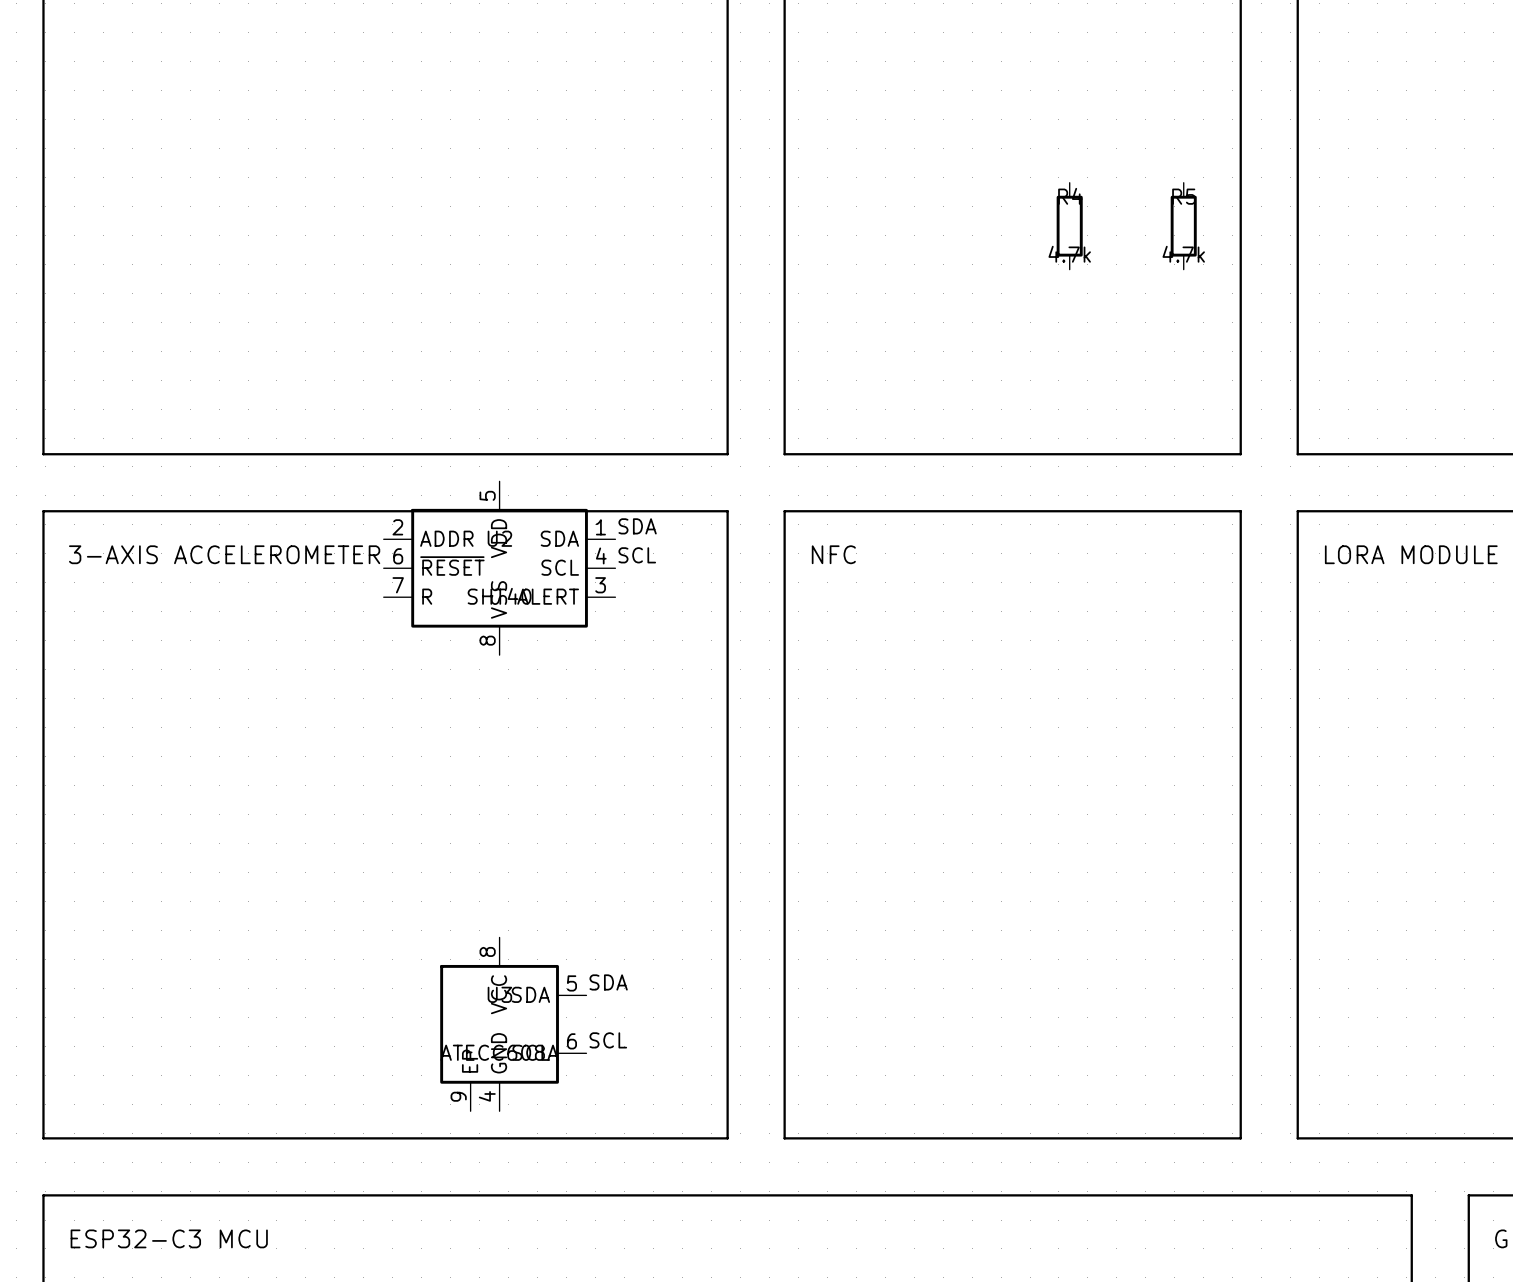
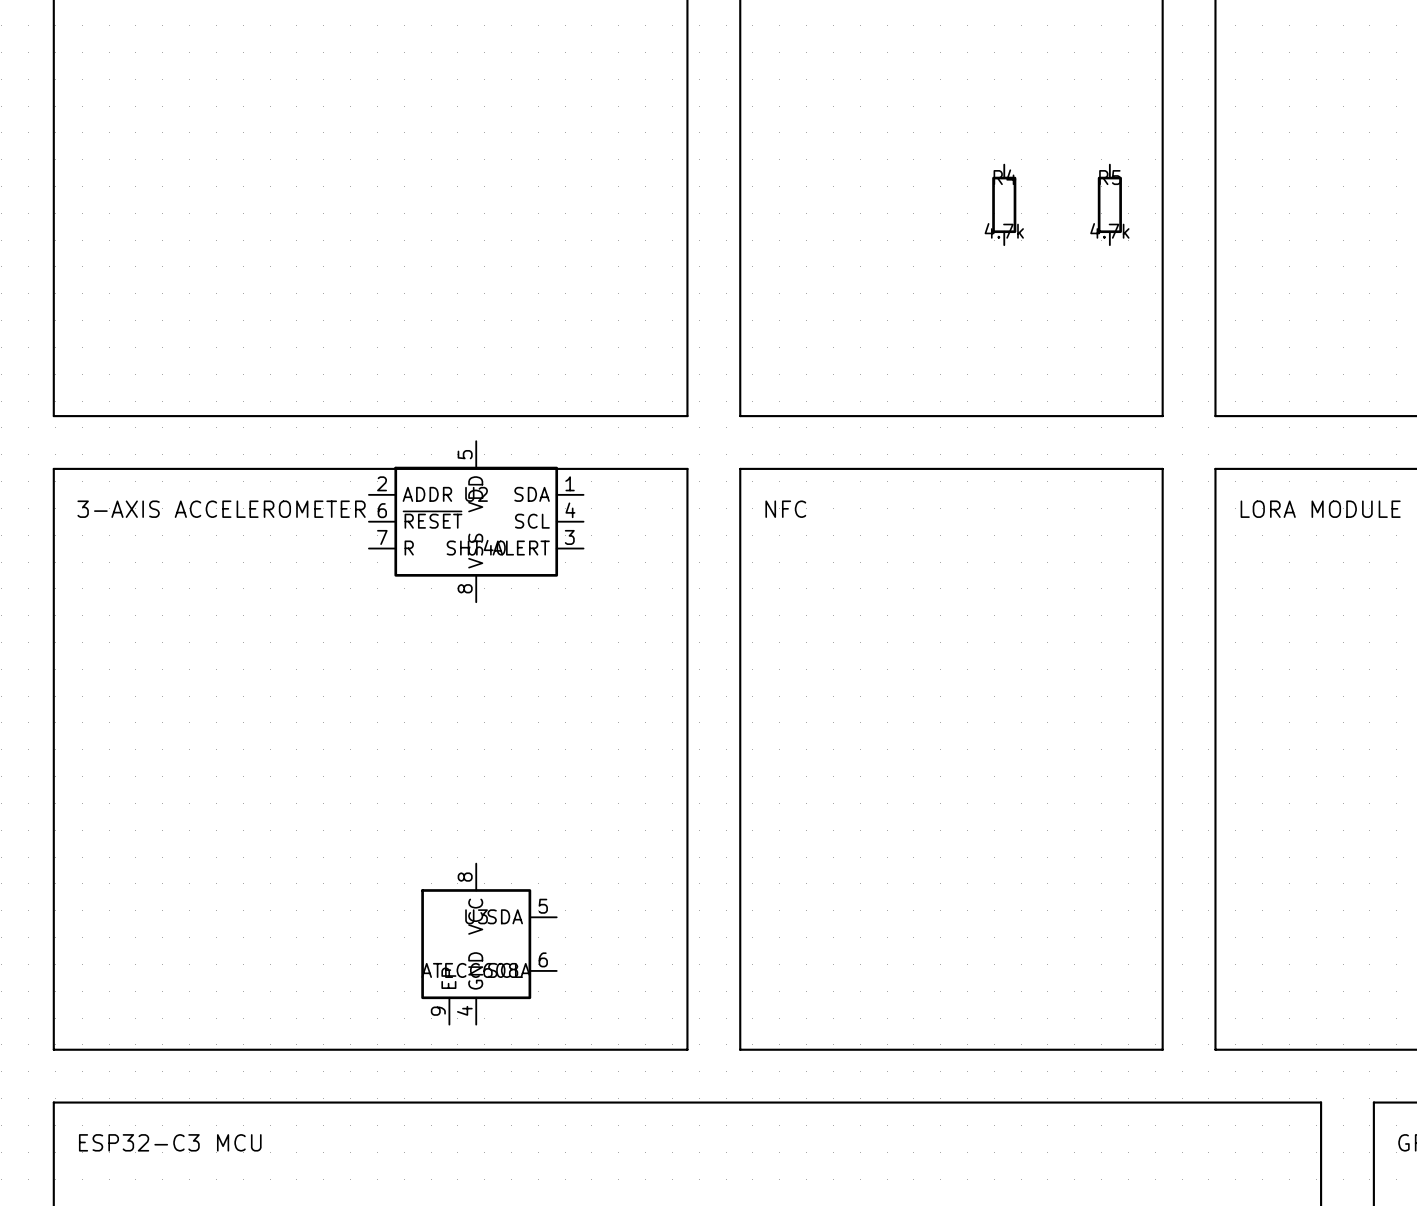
label: SDA (637, 526) -> none
label: SCL (637, 555) -> none
label: SDA (608, 982) -> none
label: SCL (608, 1040) -> none

